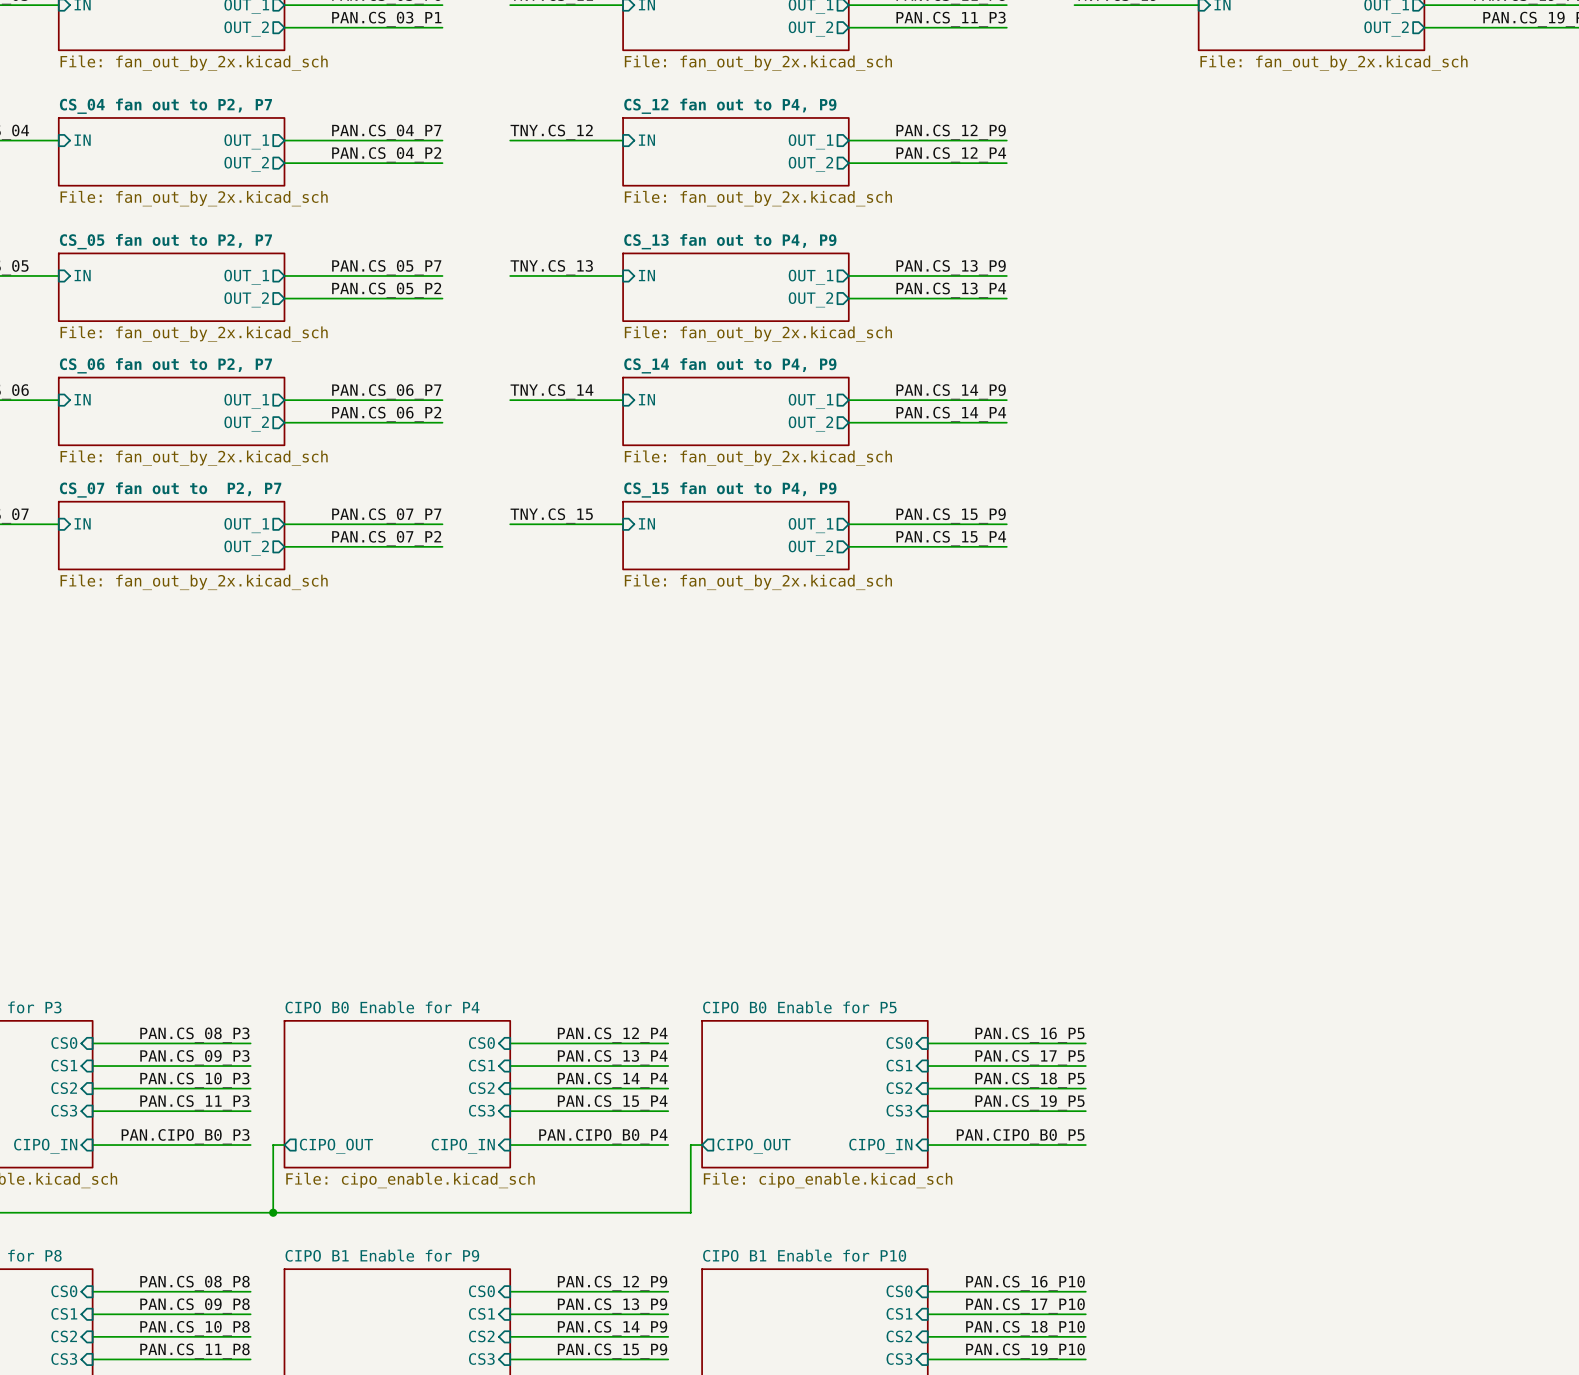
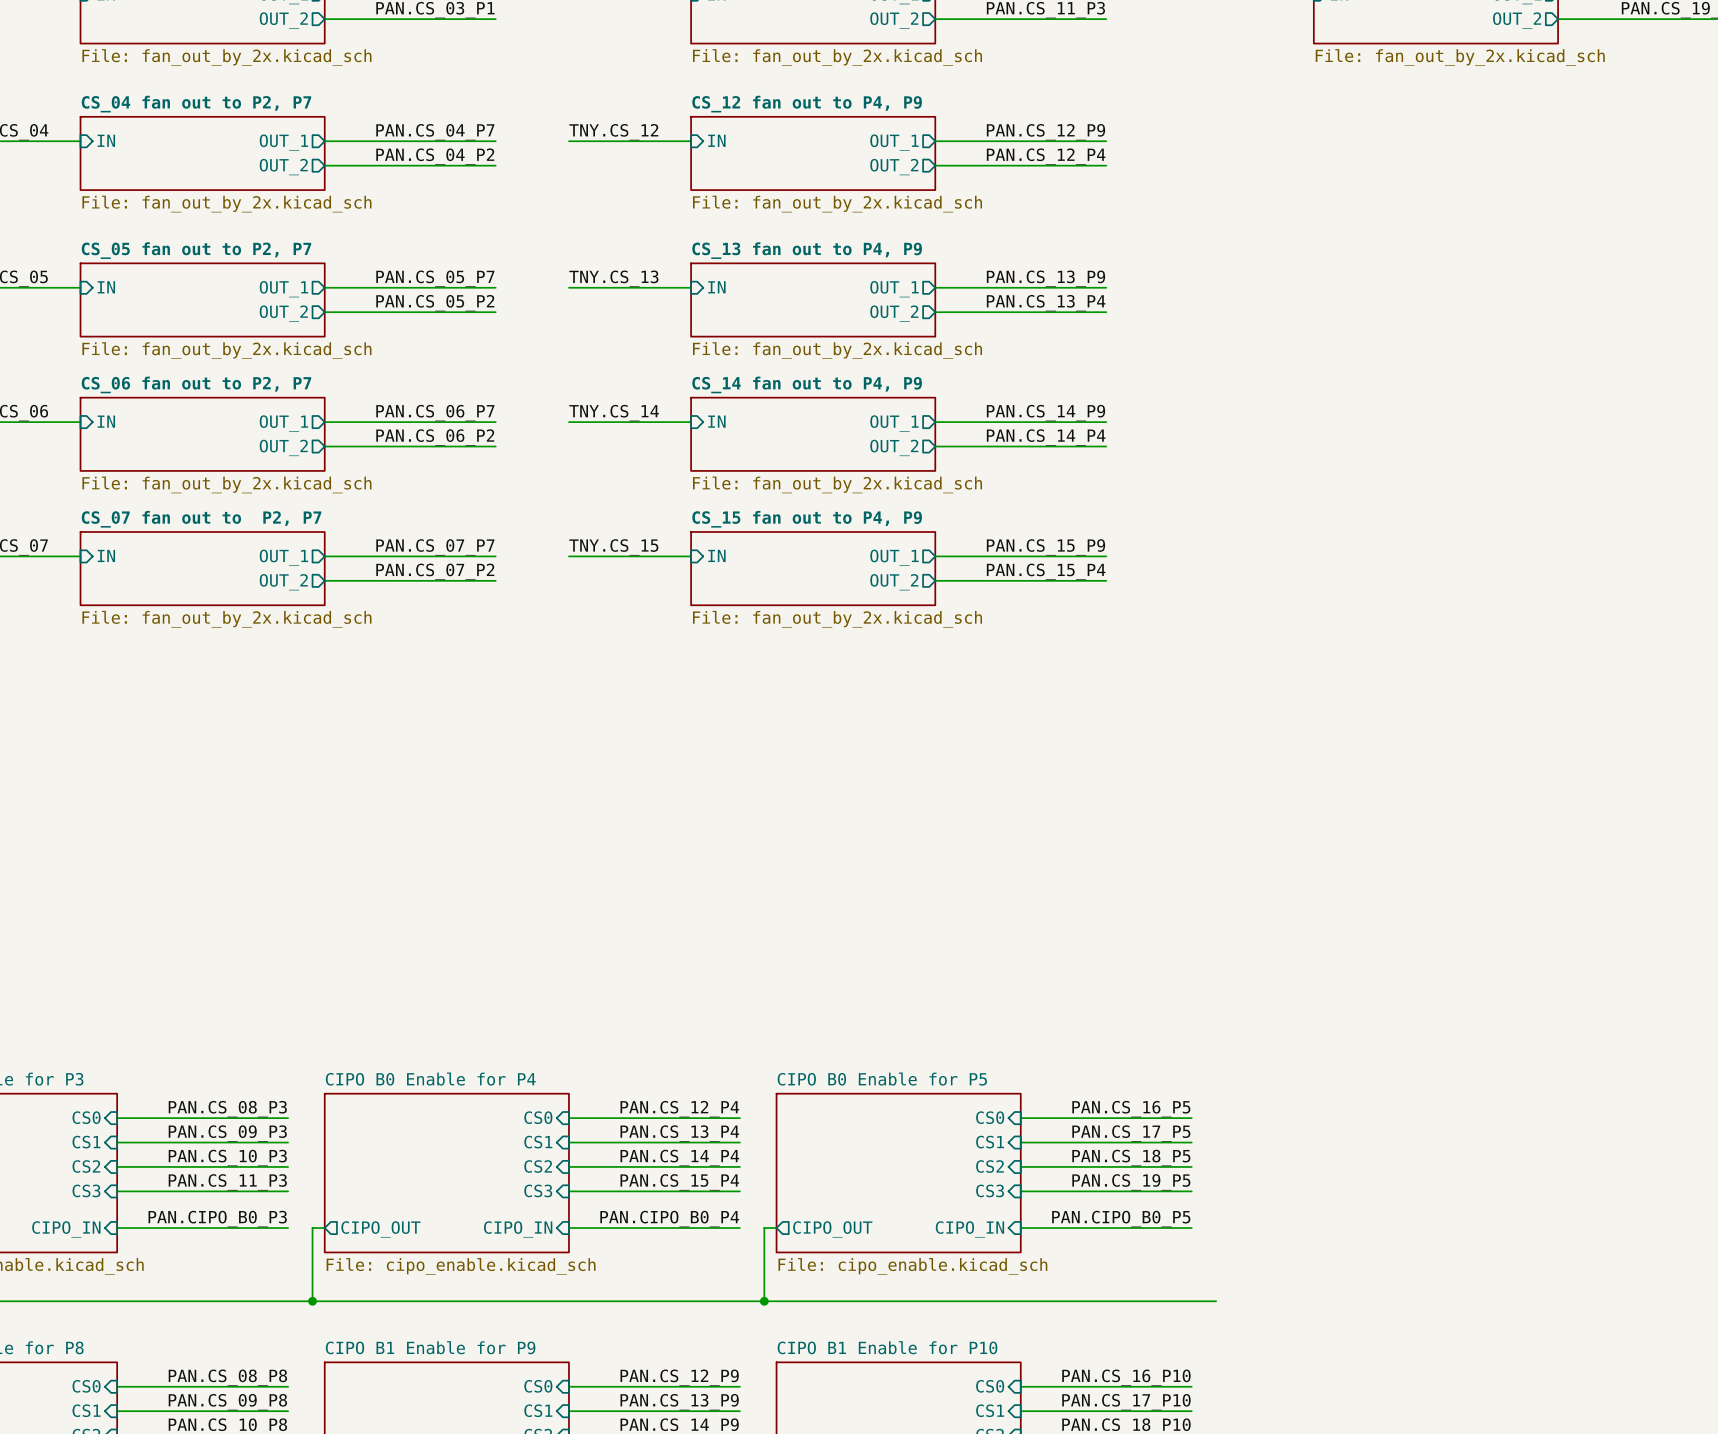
wire: none -> (764, 1301) (1216, 1301)
junction: none -> (764, 1301)

